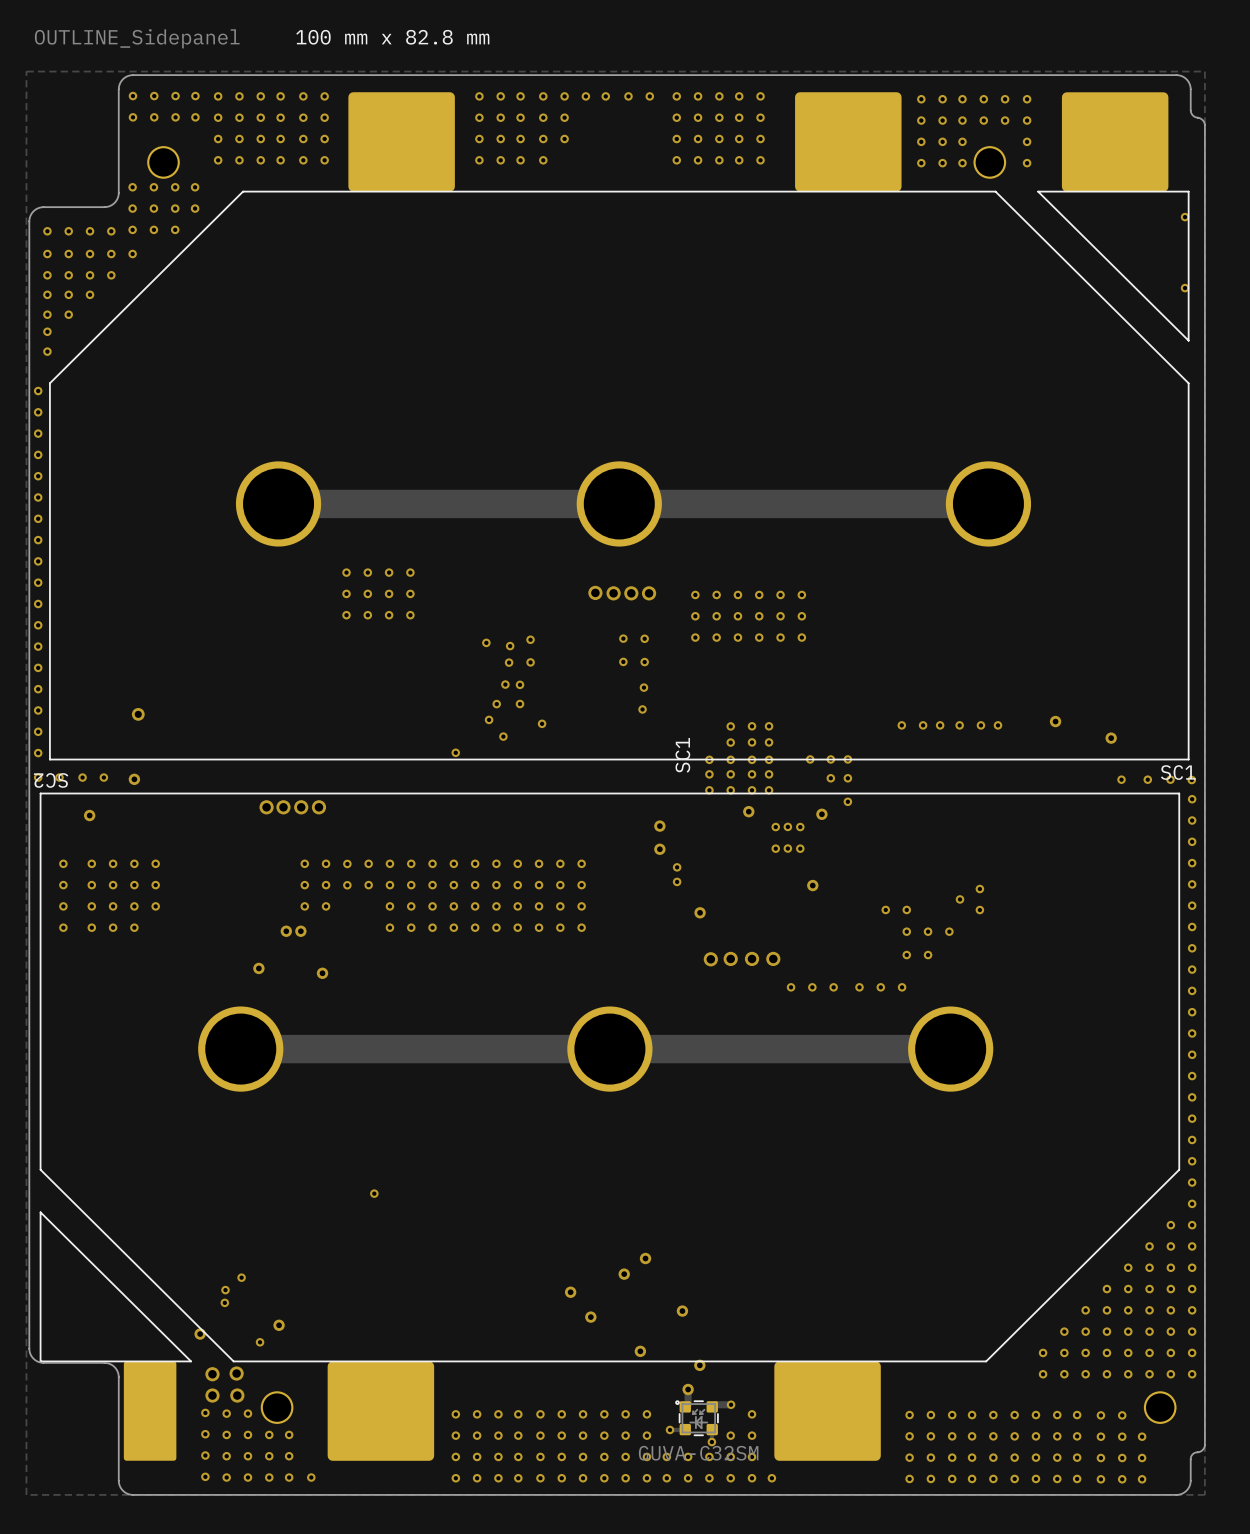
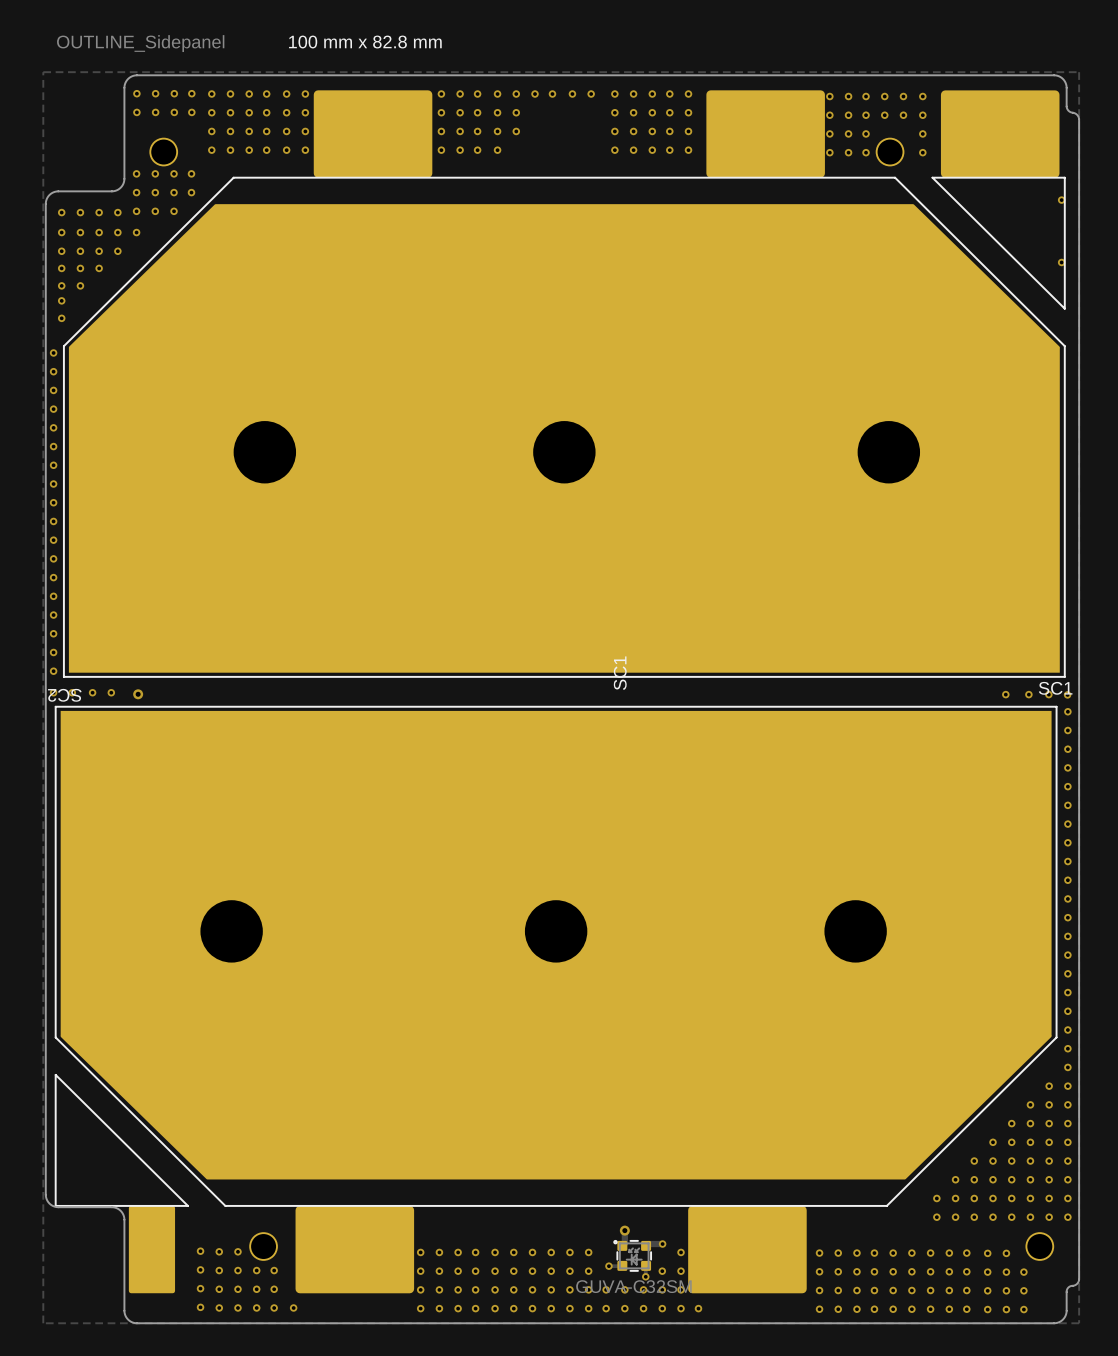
SC1 footprint: [49, 92, 1190, 761] -> [63, 90, 1066, 678]
track: (278, 503) (988, 503) -> none
via: (346, 572) -> none
via: (367, 572) -> none
via: (389, 572) -> none
via: (410, 572) -> none
via: (595, 592) -> none
via: (346, 593) -> none
via: (367, 593) -> none
via: (389, 593) -> none
via: (410, 593) -> none
via: (613, 593) -> none
via: (631, 593) -> none
via: (649, 593) -> none
via: (695, 594) -> none
via: (716, 594) -> none
via: (737, 594) -> none
via: (759, 594) -> none
via: (780, 594) -> none
via: (801, 594) -> none
via: (346, 615) -> none
via: (367, 615) -> none
via: (389, 615) -> none
via: (410, 615) -> none
via: (695, 616) -> none
via: (716, 616) -> none
via: (737, 616) -> none
via: (759, 616) -> none
via: (780, 616) -> none
via: (801, 616) -> none
via: (695, 637) -> none
via: (716, 637) -> none
via: (737, 637) -> none
via: (759, 637) -> none
via: (780, 637) -> none
via: (801, 637) -> none
via: (623, 638) -> none
via: (644, 638) -> none
via: (530, 639) -> none
via: (486, 642) -> none
via: (510, 646) -> none
via: (623, 661) -> none
via: (509, 662) -> none
via: (530, 662) -> none
via: (644, 662) -> none
via: (505, 684) -> none
via: (520, 684) -> none
via: (643, 687) -> none
via: (496, 704) -> none
via: (520, 704) -> none
via: (642, 709) -> none
via: (138, 714) -> none
via: (489, 719) -> none
via: (1055, 721) -> none
via: (542, 723) -> none
via: (901, 725) -> none
via: (923, 725) -> none
via: (940, 725) -> none
via: (959, 725) -> none
via: (980, 725) -> none
via: (997, 725) -> none
via: (730, 726) -> none
via: (752, 726) -> none
via: (769, 726) -> none
via: (503, 736) -> none
via: (1111, 738) -> none
via: (730, 742) -> none
via: (752, 742) -> none
via: (769, 742) -> none
via: (455, 752) -> none
via: (709, 759) -> none
via: (730, 759) -> none
via: (752, 759) -> none
via: (769, 759) -> none
via: (810, 759) -> none
via: (830, 759) -> none
via: (847, 759) -> none
via: (709, 774) -> none
via: (730, 774) -> none
via: (752, 774) -> none
via: (769, 774) -> none
via: (830, 778) -> none
via: (847, 778) -> none
via: (709, 790) -> none
via: (730, 790) -> none
via: (752, 790) -> none
via: (769, 790) -> none
SC2 footprint: [39, 792, 1181, 1461] -> [54, 705, 1058, 1294]
via: (847, 801) -> none
via: (266, 807) -> none
via: (283, 807) -> none
via: (301, 807) -> none
via: (318, 807) -> none
via: (748, 811) -> none
via: (821, 814) -> none
via: (89, 815) -> none
via: (659, 826) -> none
via: (787, 826) -> none
via: (775, 827) -> none
via: (800, 827) -> none
via: (775, 848) -> none
via: (787, 848) -> none
via: (800, 848) -> none
via: (659, 849) -> none
via: (63, 863) -> none
via: (91, 863) -> none
via: (113, 863) -> none
via: (134, 863) -> none
via: (155, 863) -> none
via: (304, 863) -> none
via: (326, 863) -> none
via: (347, 863) -> none
via: (368, 863) -> none
via: (389, 863) -> none
via: (411, 863) -> none
via: (432, 863) -> none
via: (453, 863) -> none
via: (475, 863) -> none
via: (496, 863) -> none
via: (517, 863) -> none
via: (539, 863) -> none
via: (560, 863) -> none
via: (581, 863) -> none
via: (677, 867) -> none
via: (677, 881) -> none
via: (63, 885) -> none
via: (91, 885) -> none
via: (113, 885) -> none
via: (134, 885) -> none
via: (155, 885) -> none
via: (304, 885) -> none
via: (326, 885) -> none
via: (347, 885) -> none
via: (368, 885) -> none
via: (389, 885) -> none
via: (411, 885) -> none
via: (432, 885) -> none
via: (453, 885) -> none
via: (475, 885) -> none
via: (496, 885) -> none
via: (517, 885) -> none
via: (539, 885) -> none
via: (560, 885) -> none
via: (581, 885) -> none
via: (812, 885) -> none
via: (979, 889) -> none
via: (960, 899) -> none
via: (63, 906) -> none
via: (91, 906) -> none
via: (113, 906) -> none
via: (134, 906) -> none
via: (155, 906) -> none
via: (304, 906) -> none
via: (326, 906) -> none
via: (389, 906) -> none
via: (411, 906) -> none
via: (432, 906) -> none
via: (453, 906) -> none
via: (475, 906) -> none
via: (496, 906) -> none
via: (517, 906) -> none
via: (539, 906) -> none
via: (560, 906) -> none
via: (581, 906) -> none
via: (885, 909) -> none
via: (906, 909) -> none
via: (979, 910) -> none
via: (700, 912) -> none
via: (63, 927) -> none
via: (91, 927) -> none
via: (113, 927) -> none
via: (134, 927) -> none
via: (389, 927) -> none
via: (411, 927) -> none
via: (432, 927) -> none
via: (453, 927) -> none
via: (475, 927) -> none
via: (496, 927) -> none
via: (517, 927) -> none
via: (539, 927) -> none
via: (560, 927) -> none
via: (581, 927) -> none
via: (286, 931) -> none
via: (300, 931) -> none
via: (906, 931) -> none
via: (928, 931) -> none
via: (949, 931) -> none
via: (906, 955) -> none
via: (928, 955) -> none
via: (730, 958) -> none
via: (752, 958) -> none
via: (773, 958) -> none
via: (710, 959) -> none
via: (258, 968) -> none
via: (322, 973) -> none
via: (791, 987) -> none
via: (812, 987) -> none
via: (833, 987) -> none
via: (859, 987) -> none
via: (880, 987) -> none
via: (902, 987) -> none
track: (240, 1049) (950, 1049) -> none
via: (374, 1193) -> none
via: (645, 1258) -> none
via: (624, 1274) -> none
via: (241, 1277) -> none
via: (225, 1290) -> none
via: (570, 1292) -> none
via: (224, 1302) -> none
via: (682, 1311) -> none
via: (590, 1317) -> none
via: (279, 1325) -> none
via: (200, 1334) -> none
via: (260, 1342) -> none
via: (640, 1351) -> none
via: (699, 1365) -> none
via: (236, 1373) -> none
via: (212, 1374) -> none
via: (212, 1395) -> none
via: (237, 1395) -> none

